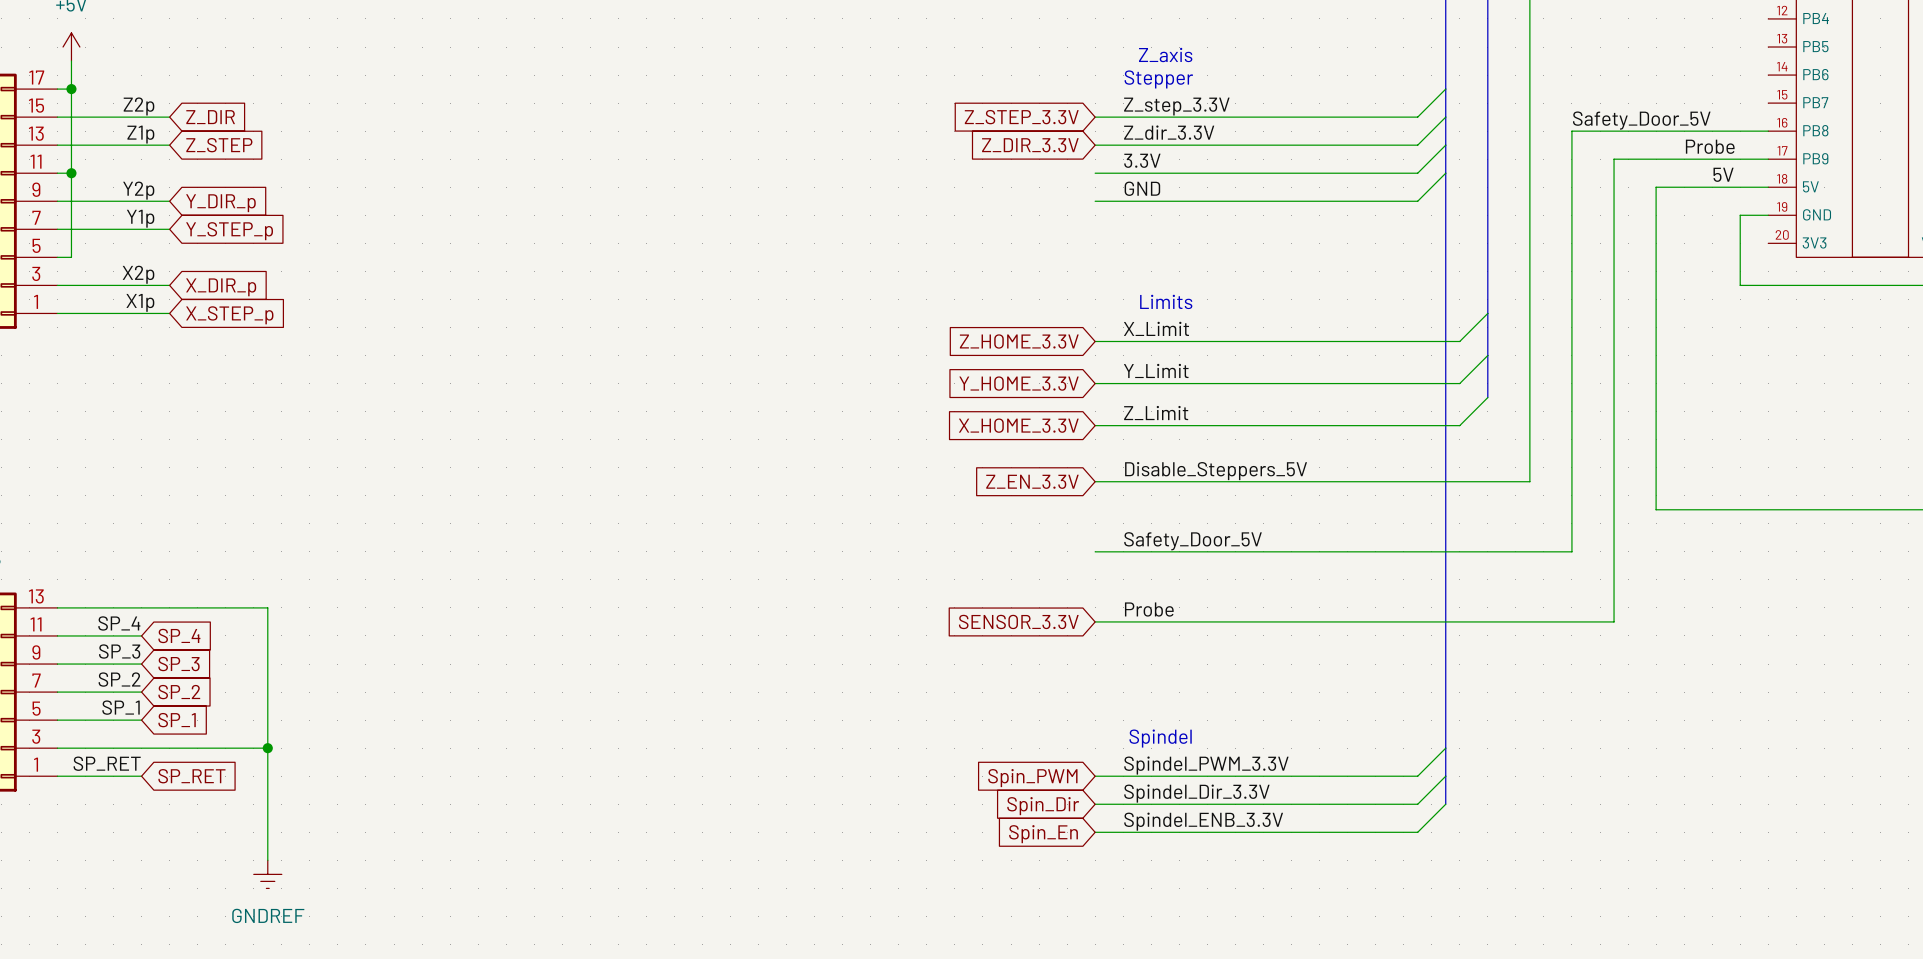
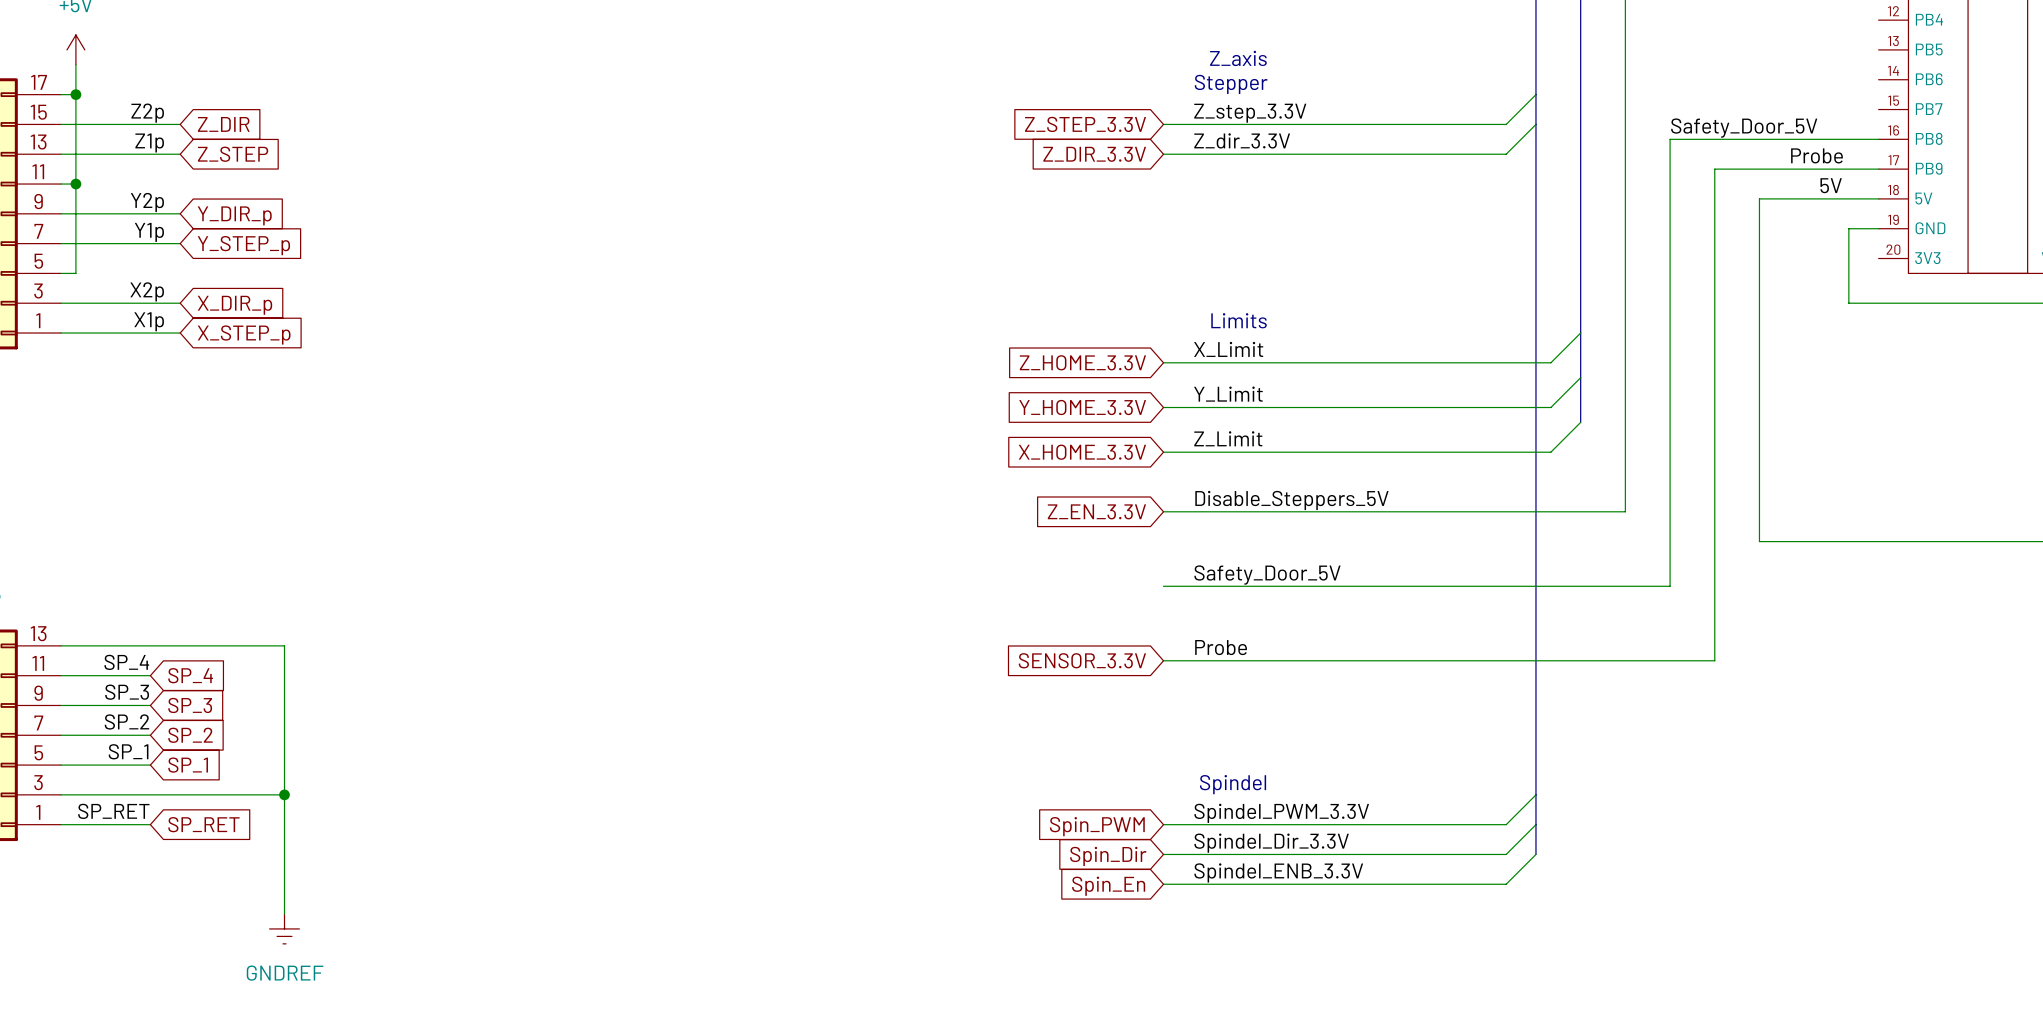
wire: (1445, 145) (1417, 173) (1095, 173) -> none
label: 3.3V (1142, 160) -> none
wire: (1445, 173) (1417, 201) (1095, 201) -> none
label: GND (1142, 188) -> none

